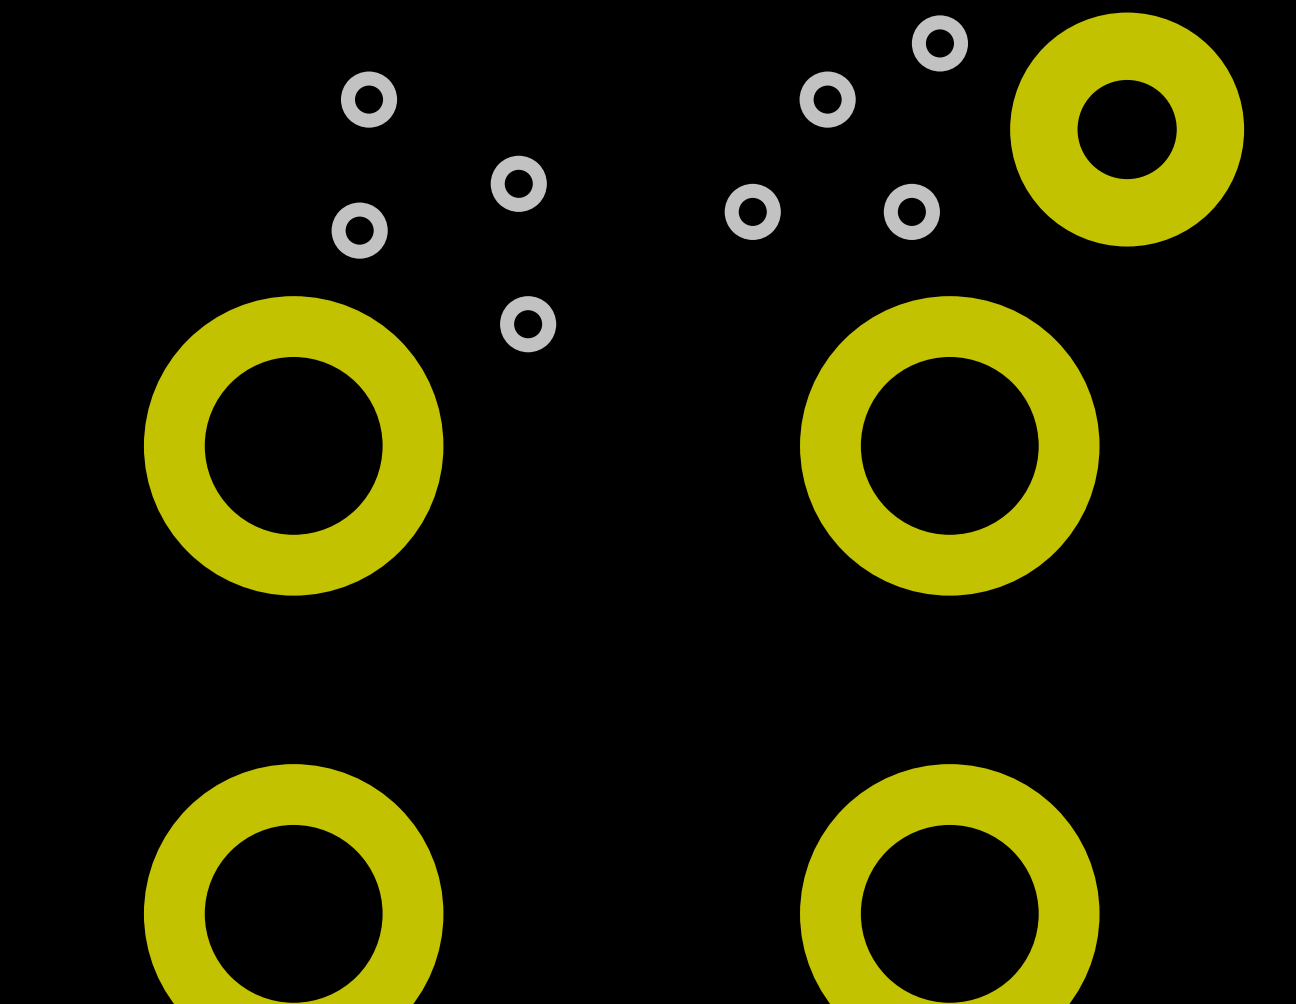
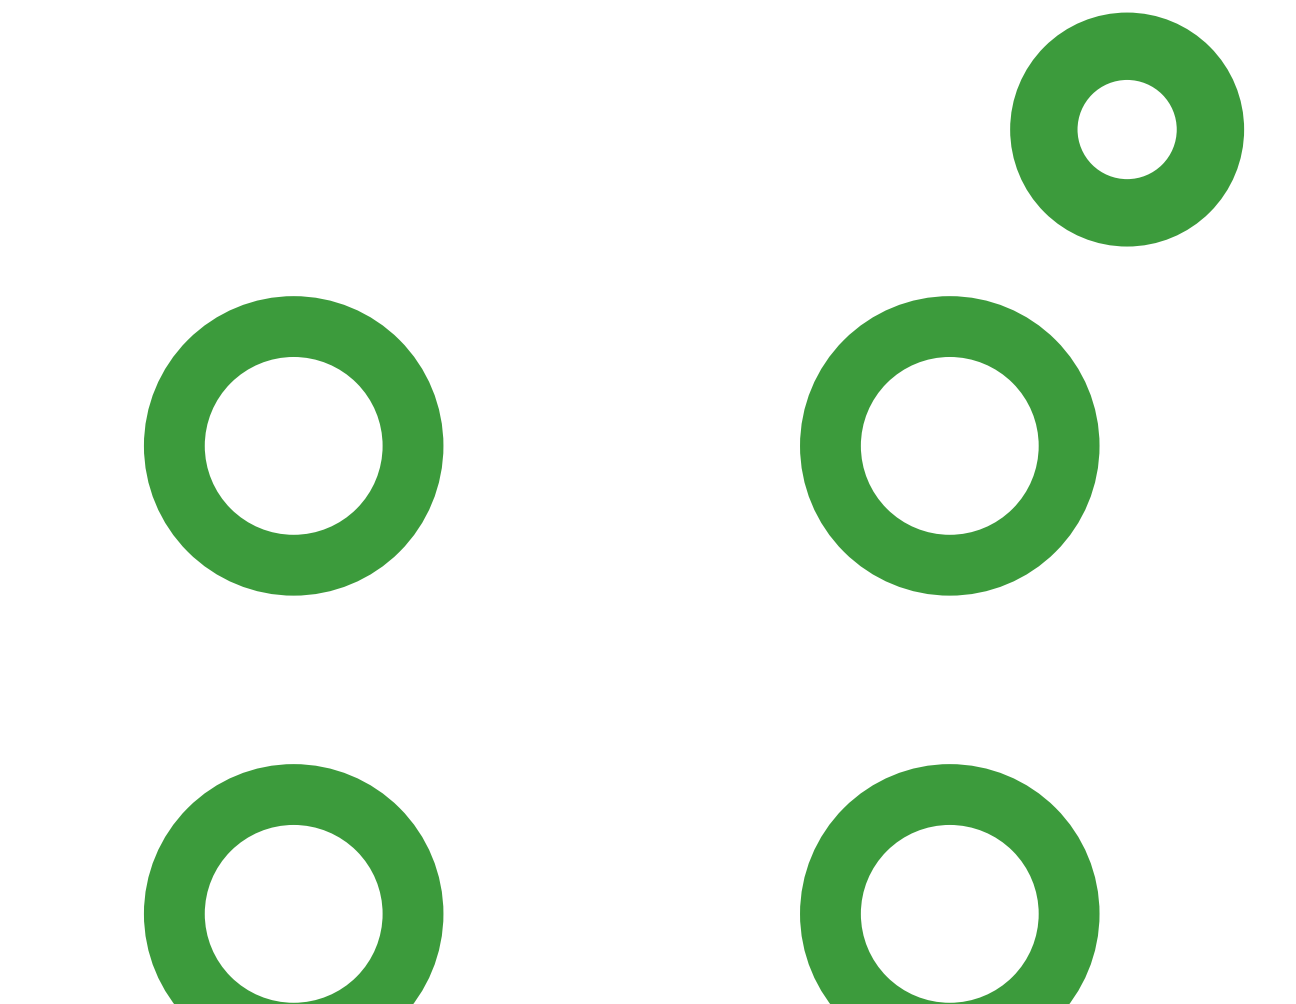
via: (939, 43) -> none
via: (369, 99) -> none
via: (827, 99) -> none
via: (518, 183) -> none
via: (752, 211) -> none
via: (911, 211) -> none
via: (359, 230) -> none
via: (528, 324) -> none

